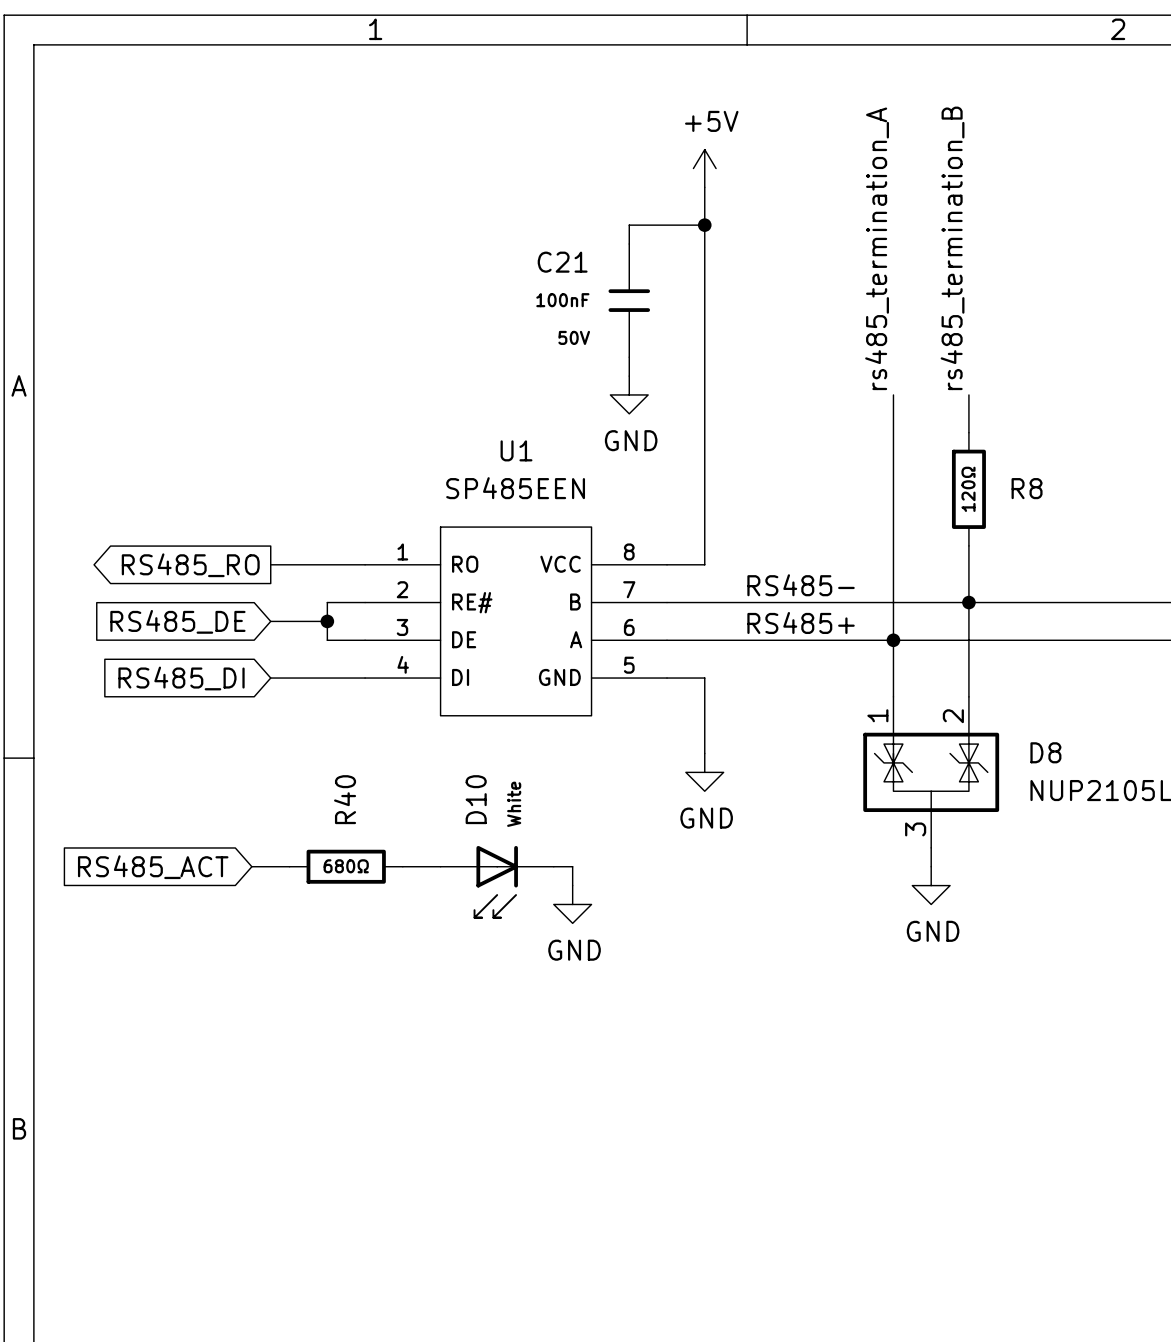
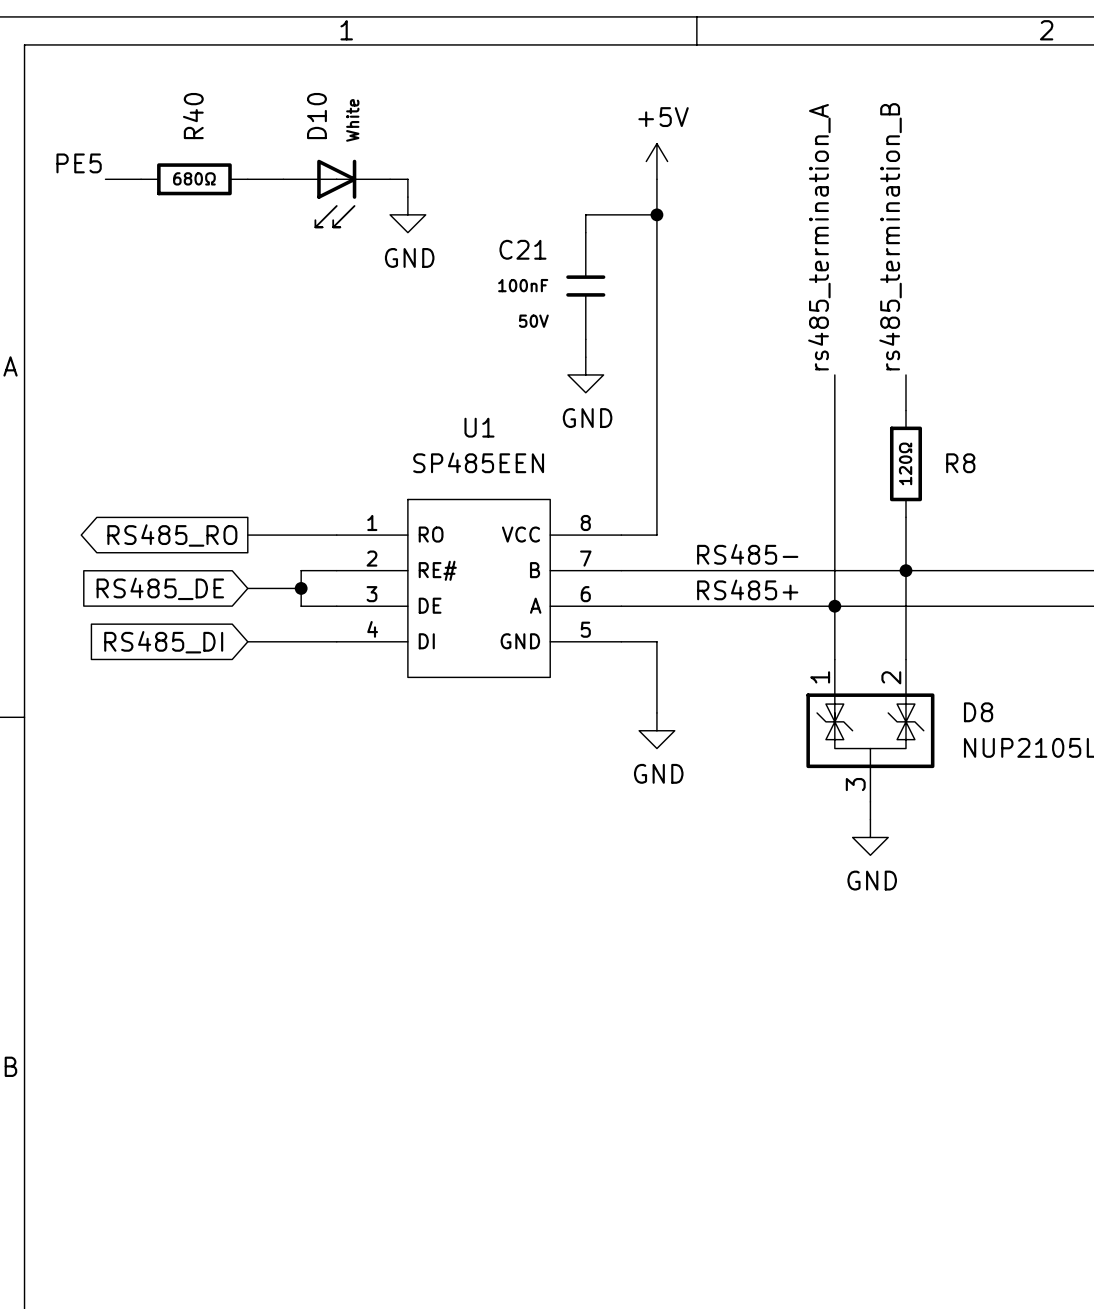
label: none -> PE5 (79, 163)
wire: none -> (105, 179) (141, 179)
wire: none -> (247, 179) (283, 179)
wire: none -> (390, 179) (407, 179) (407, 197)
power symbol: none -> GND (407, 214)
wire: (251, 866) (289, 866) -> none
R40 position: (346, 866) -> (194, 179)
wire: (402, 866) (440, 866) -> none
wire: (553, 866) (572, 866) (572, 885) -> none
global label: RS485_ACT (153, 867) -> none
D10 position: (497, 882) -> (336, 193)
power symbol: GND (572, 904) -> none

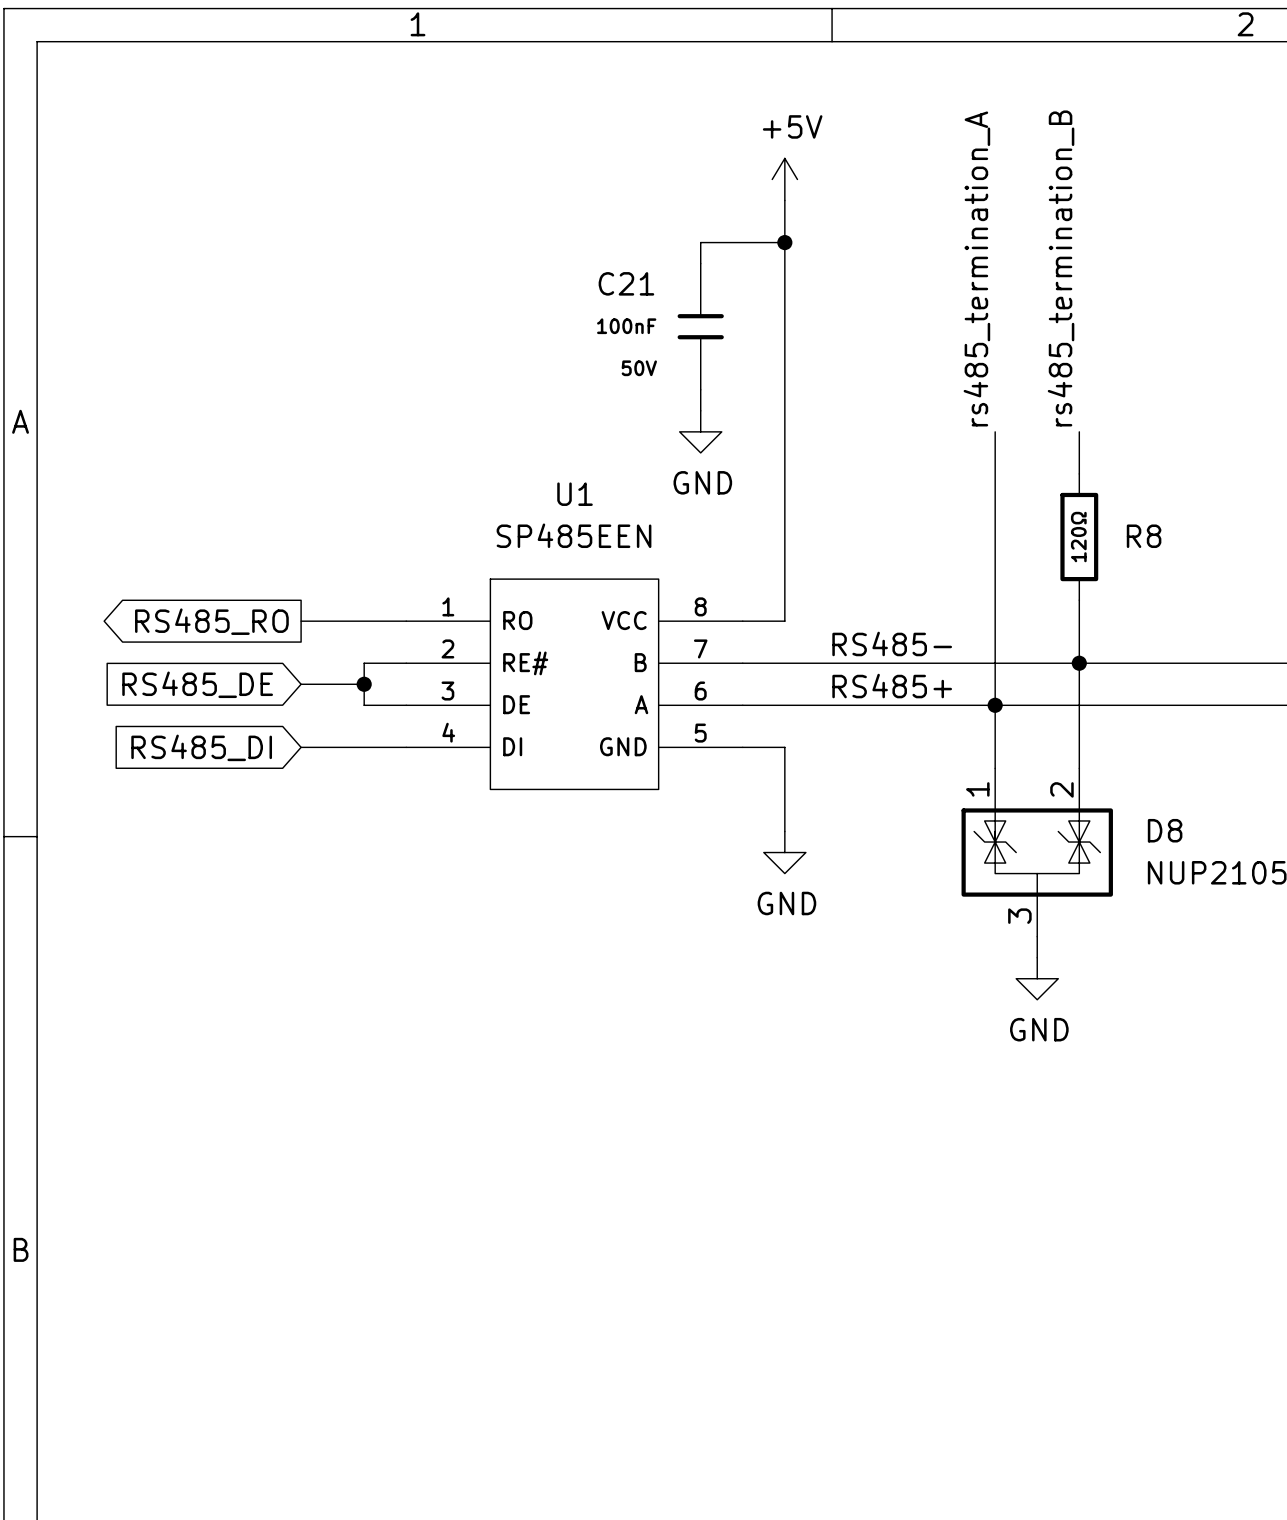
label: PE5 (79, 163) -> none
wire: (105, 179) (141, 179) -> none
R40: 680Ω (194, 179) -> none
wire: (247, 179) (283, 179) -> none
wire: (390, 179) (407, 179) (407, 197) -> none
D10: White (336, 193) -> none
power symbol: GND (407, 214) -> none

